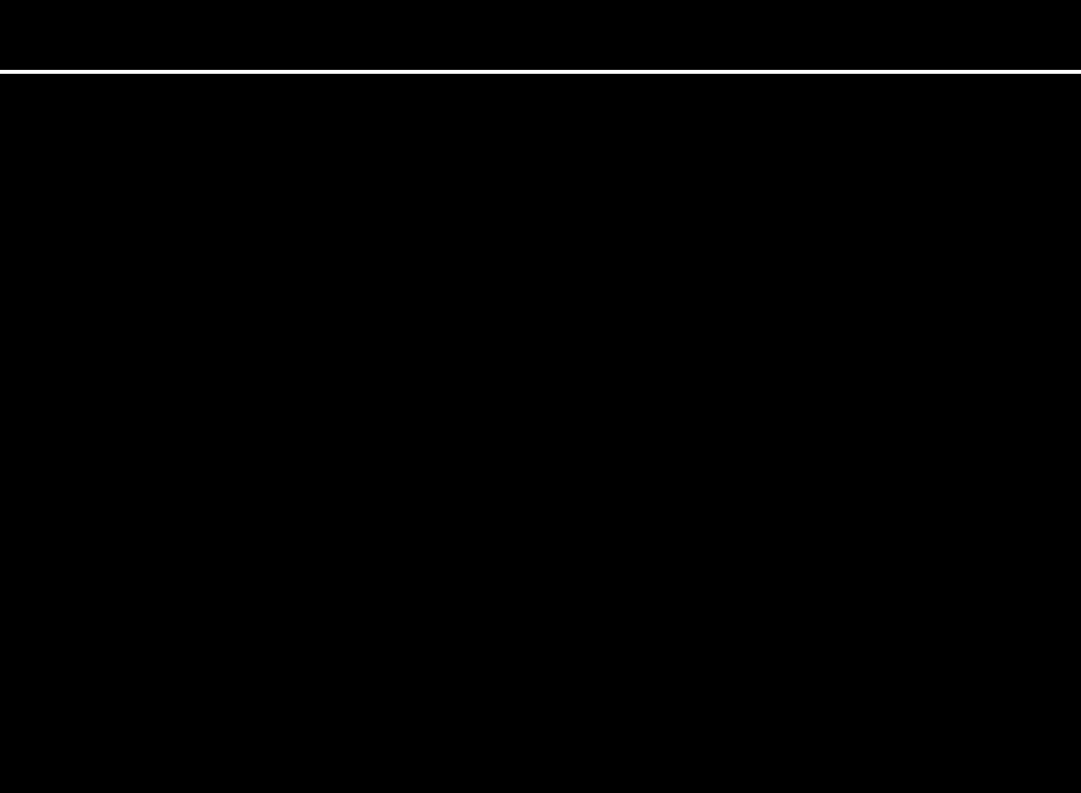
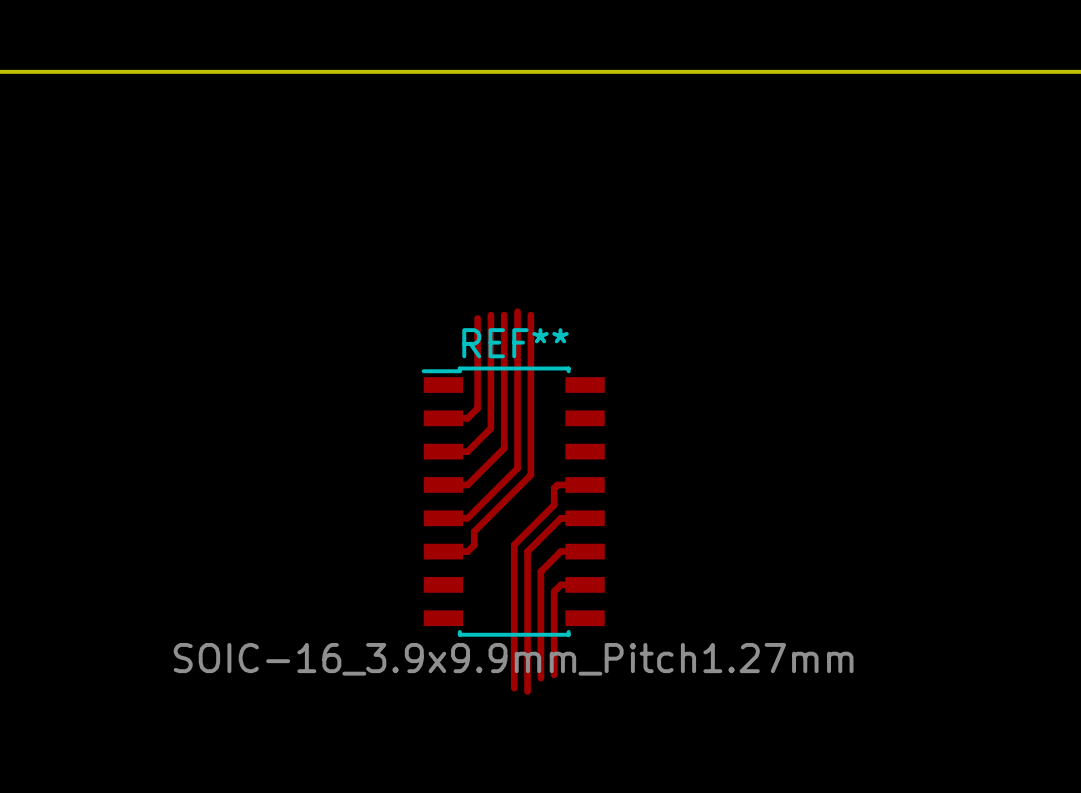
top track: none -> (517, 311) (517, 468) (467, 518) (443, 518)
top track: none -> (490, 315) (490, 428) (467, 451) (443, 451)
top track: none -> (504, 315) (504, 448) (467, 484) (443, 484)
top track: none -> (530, 315) (530, 474) (474, 531) (474, 544) (467, 551) (443, 551)
top track: none -> (477, 318) (477, 408) (467, 418) (443, 418)
top track: none -> (585, 484) (557, 484) (554, 488) (554, 504) (514, 544) (514, 688)
REF**: none -> SOIC-16_3.9x9.9mm_Pitch1.27mm (513, 501)
top track: none -> (585, 518) (560, 518) (527, 551) (527, 691)
top track: none -> (585, 551) (560, 551) (540, 571) (540, 678)
top track: none -> (585, 584) (560, 584) (554, 591) (554, 674)

